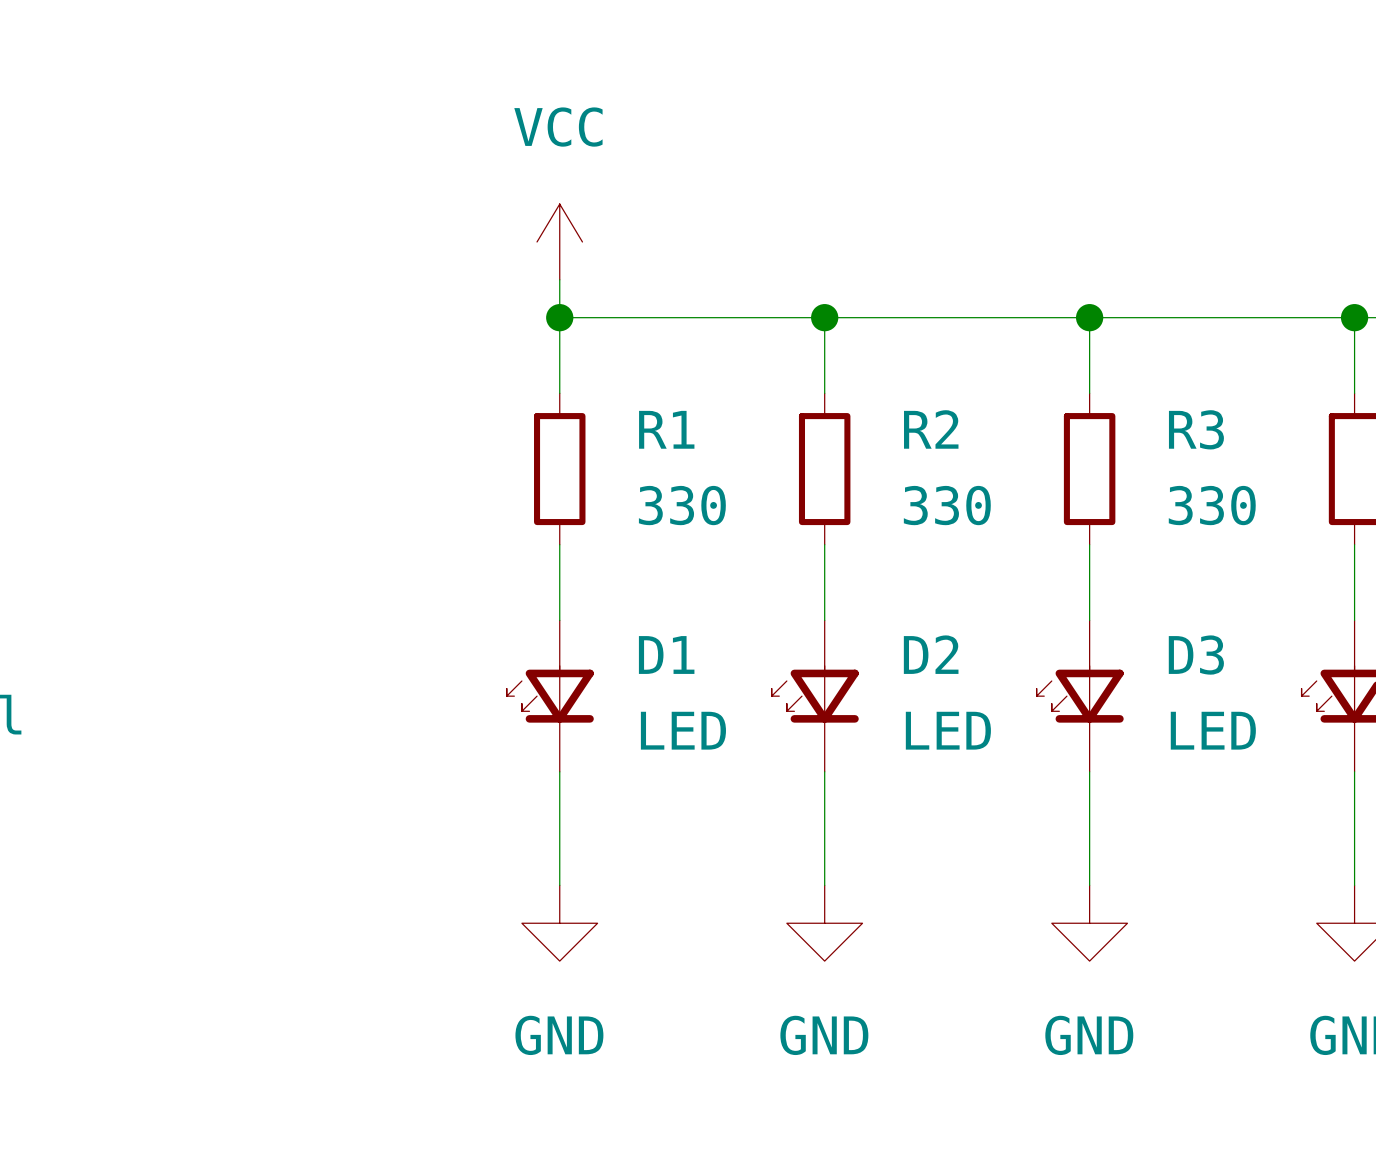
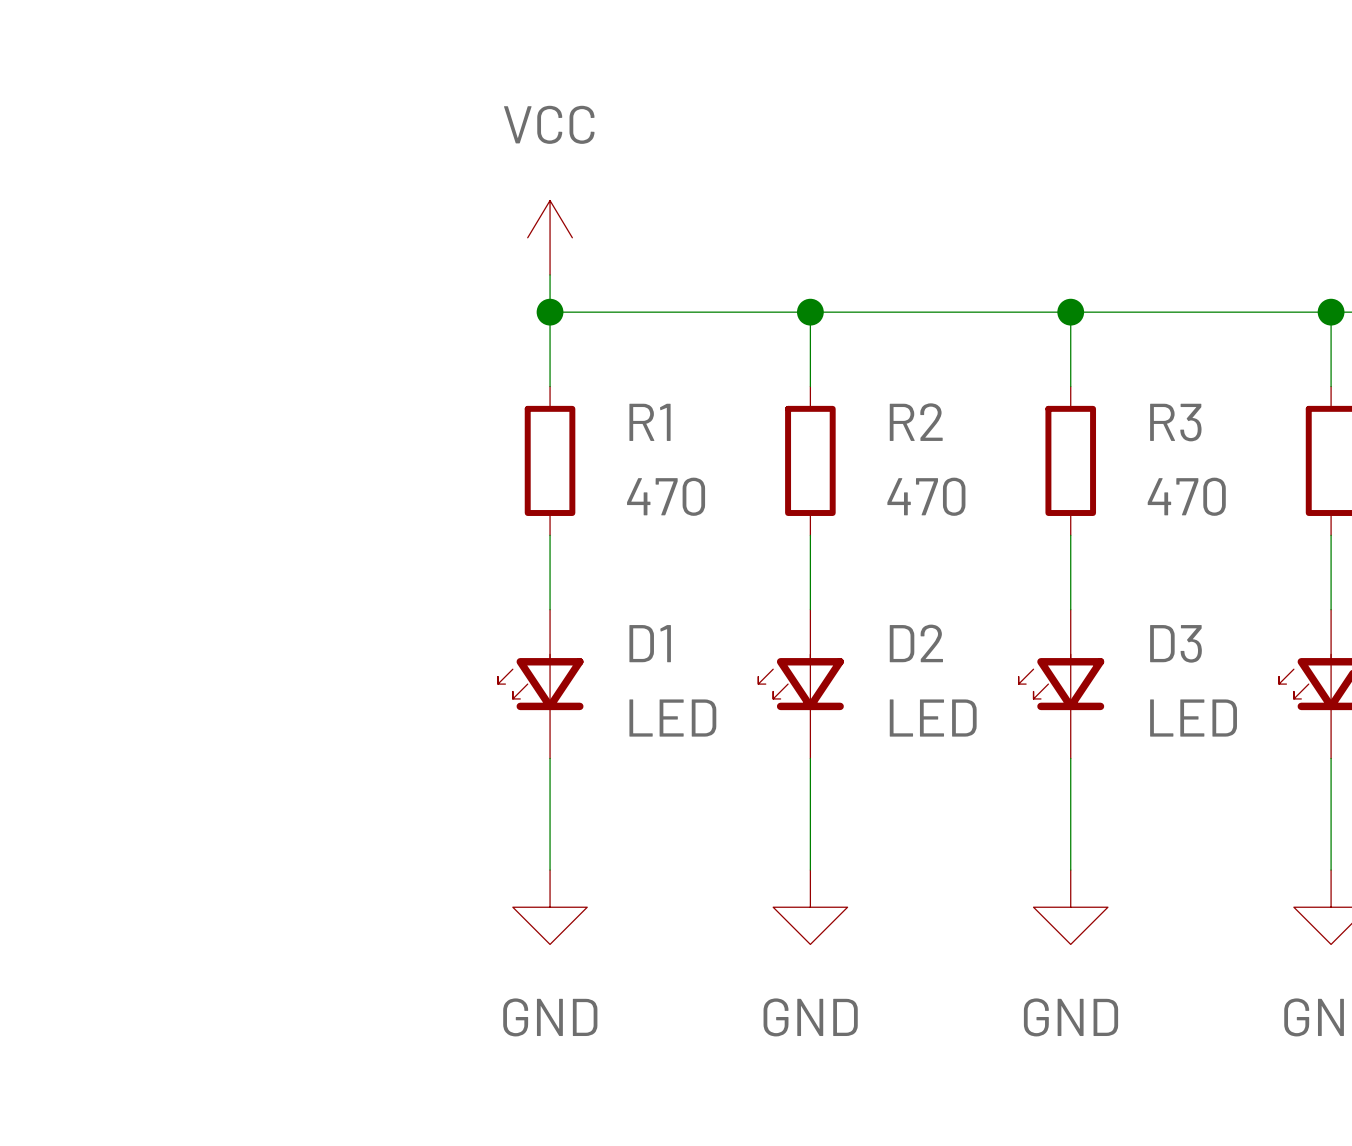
R1 value: 330 (682, 505) -> 470 (666, 496)
R2 value: 330 (947, 505) -> 470 (926, 496)
R3 value: 330 (1212, 505) -> 470 (1186, 496)

